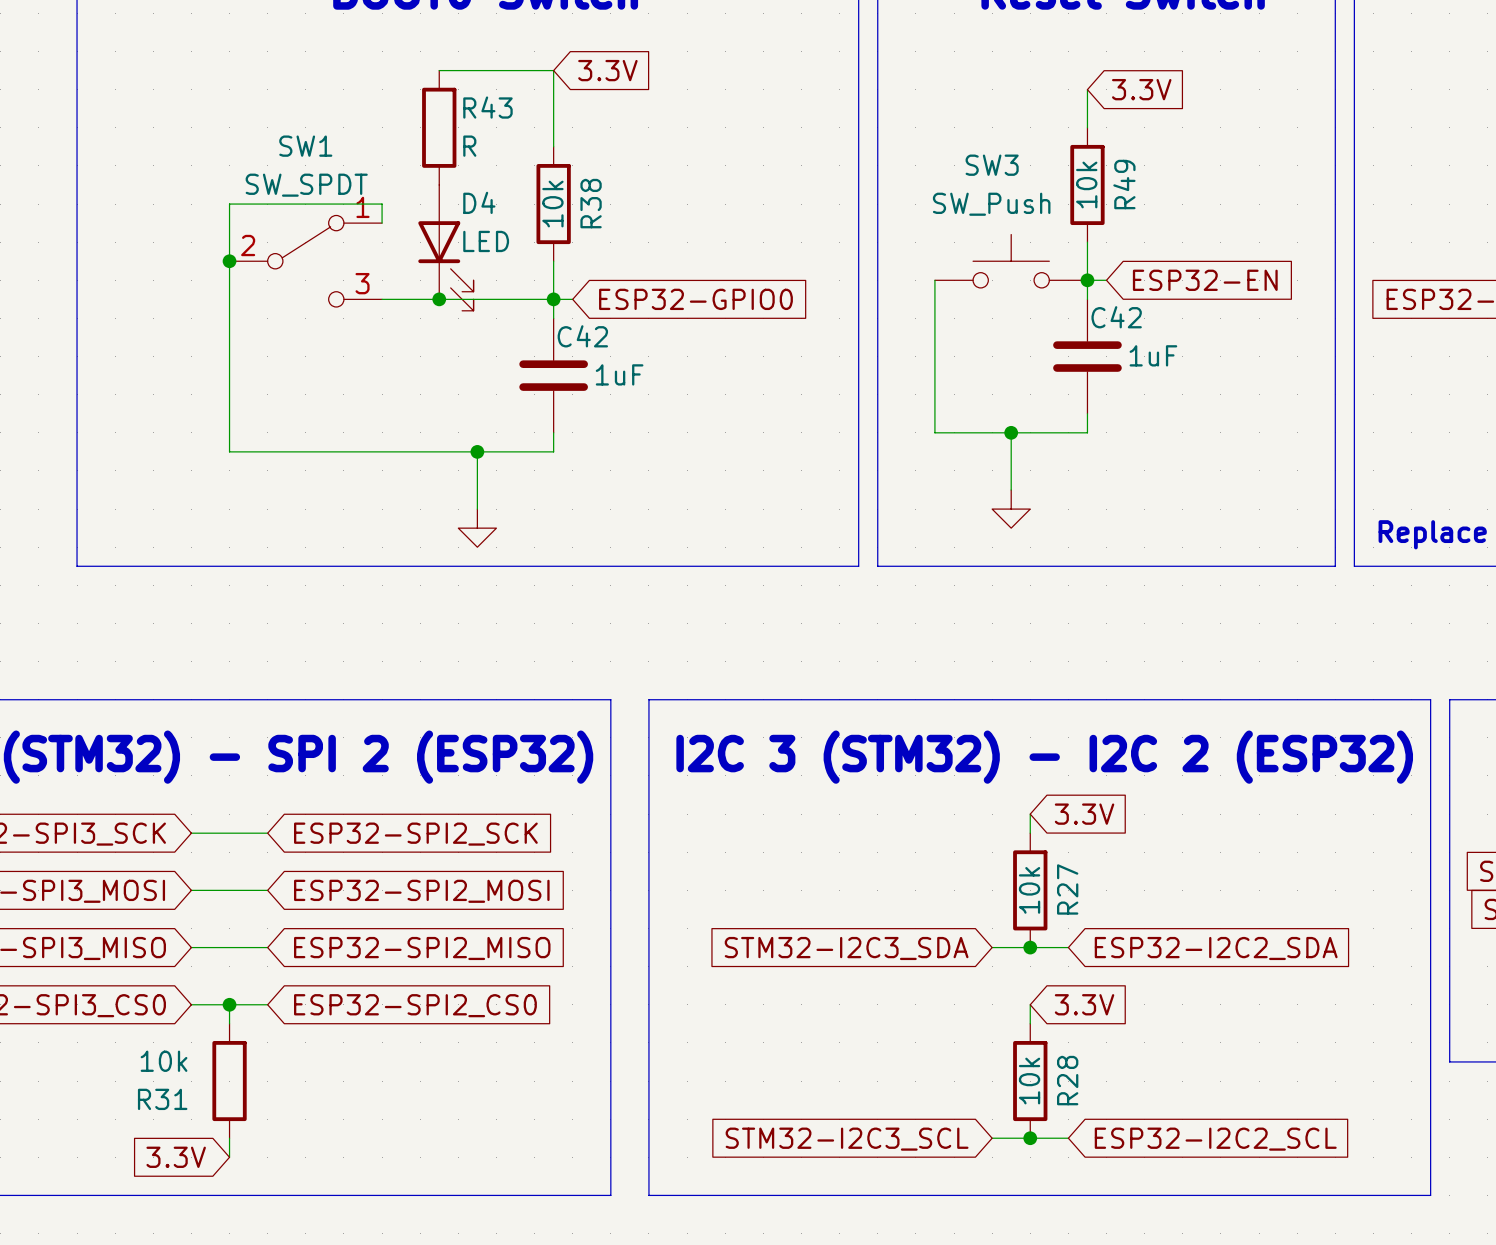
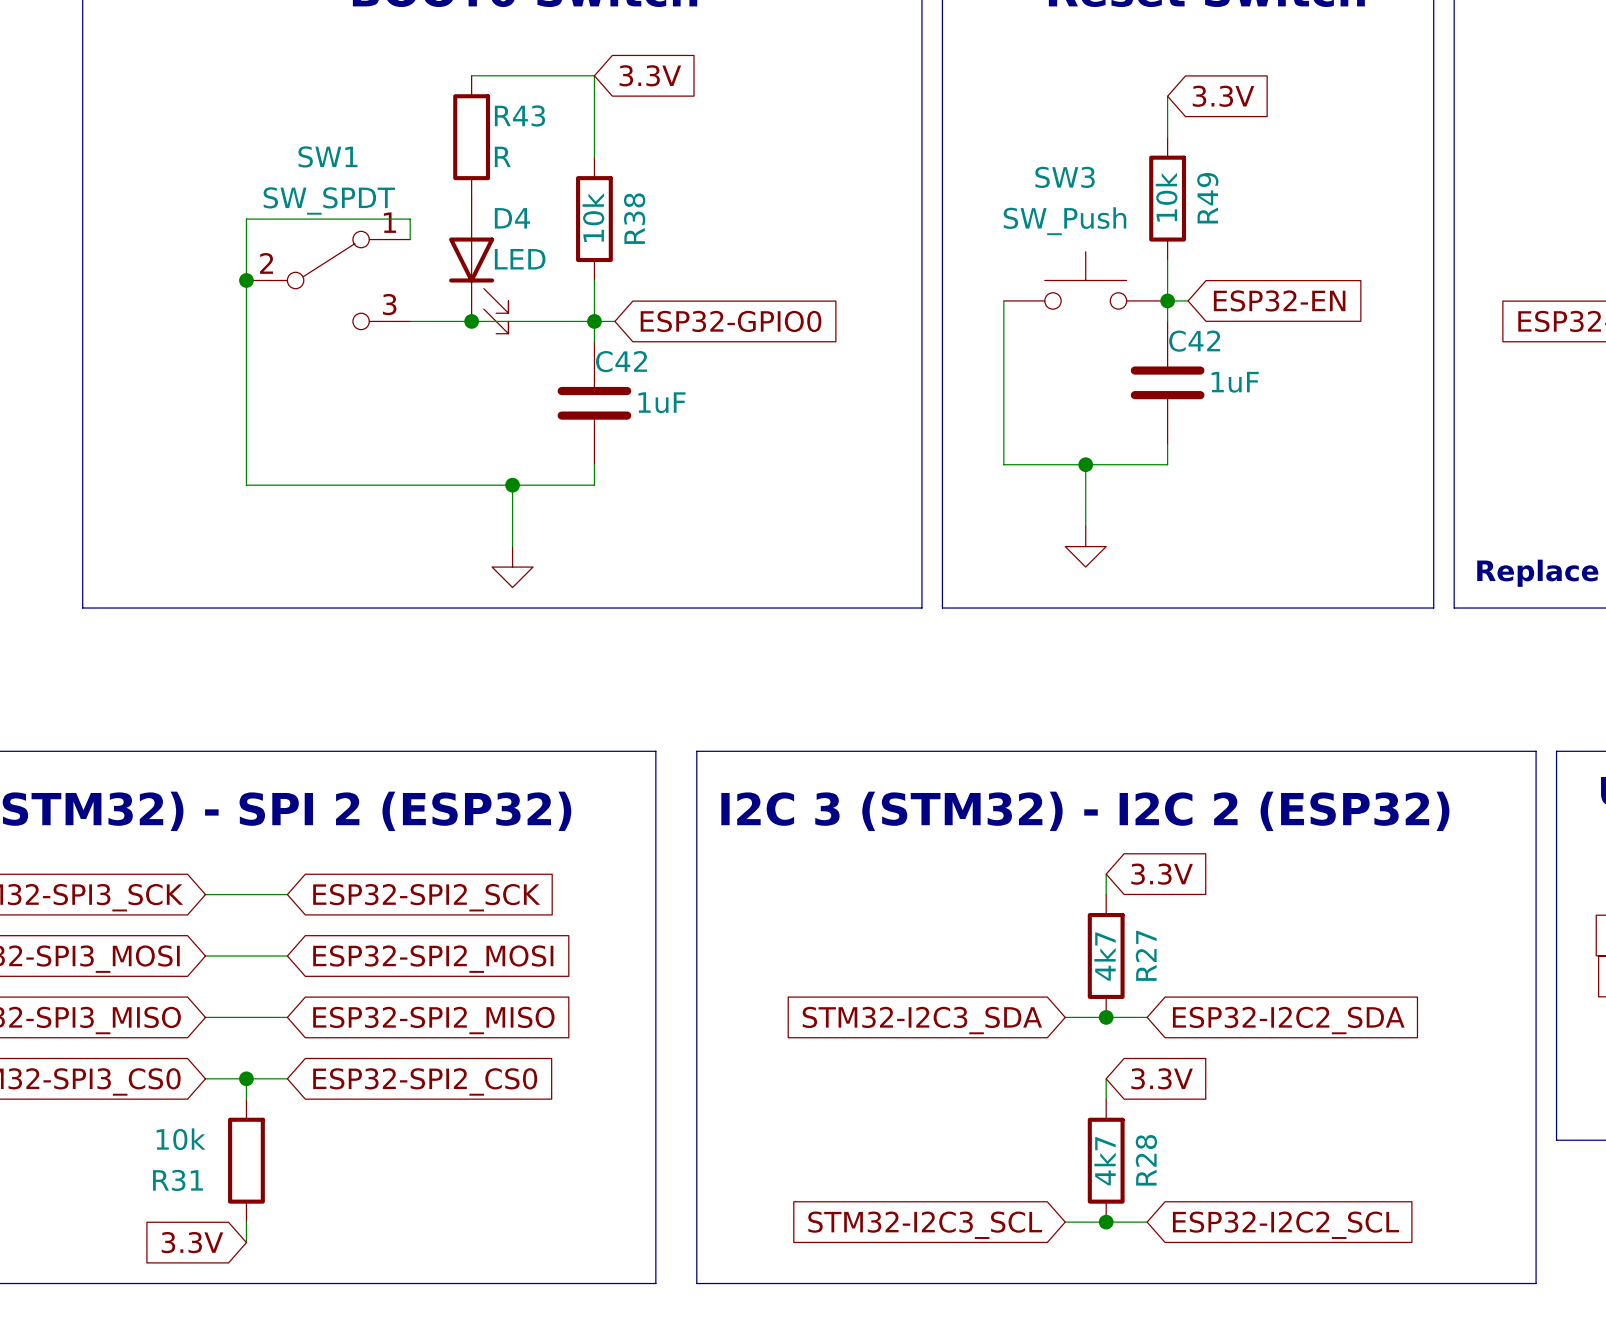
R27 value: 10k (1029, 890) -> 4k7 (1104, 956)
R28 value: 10k (1029, 1081) -> 4k7 (1104, 1161)

